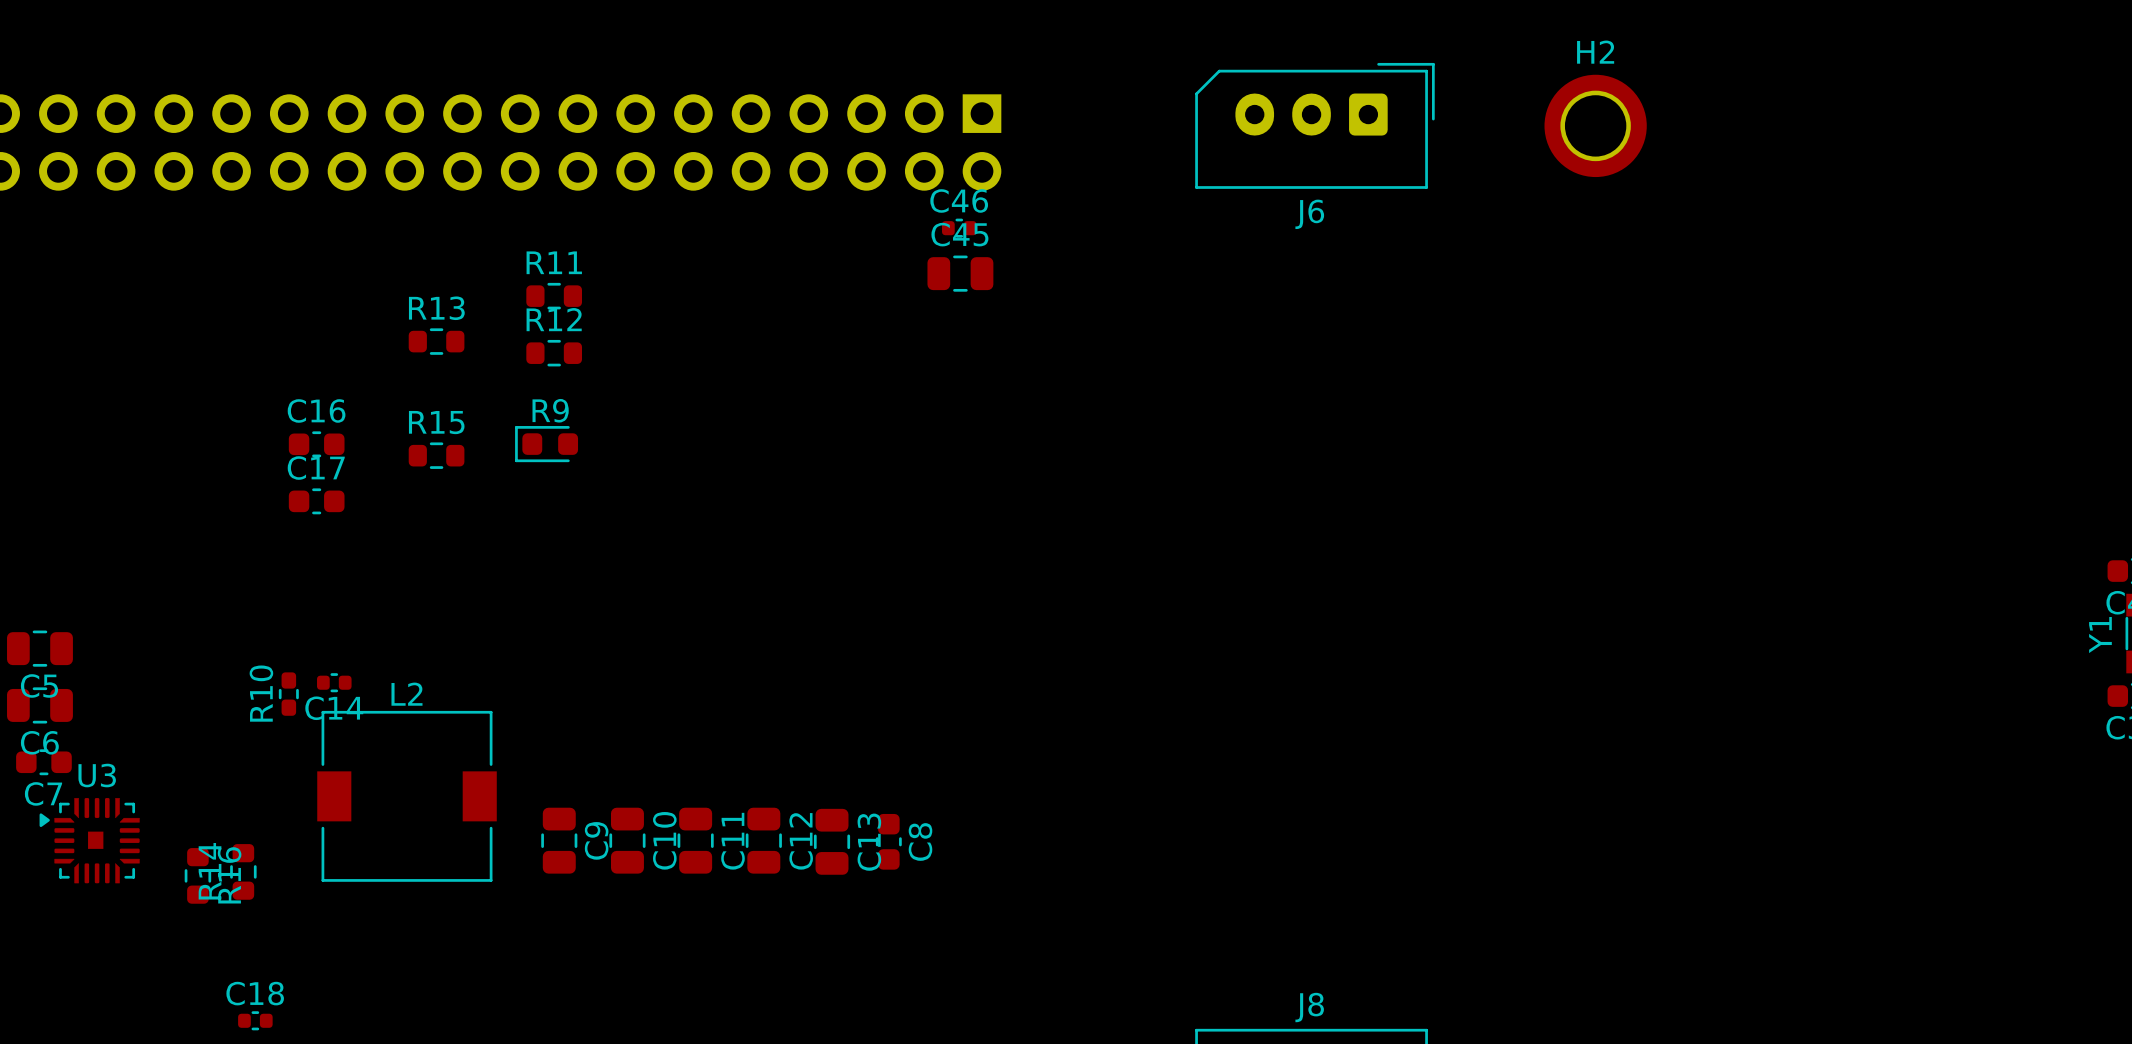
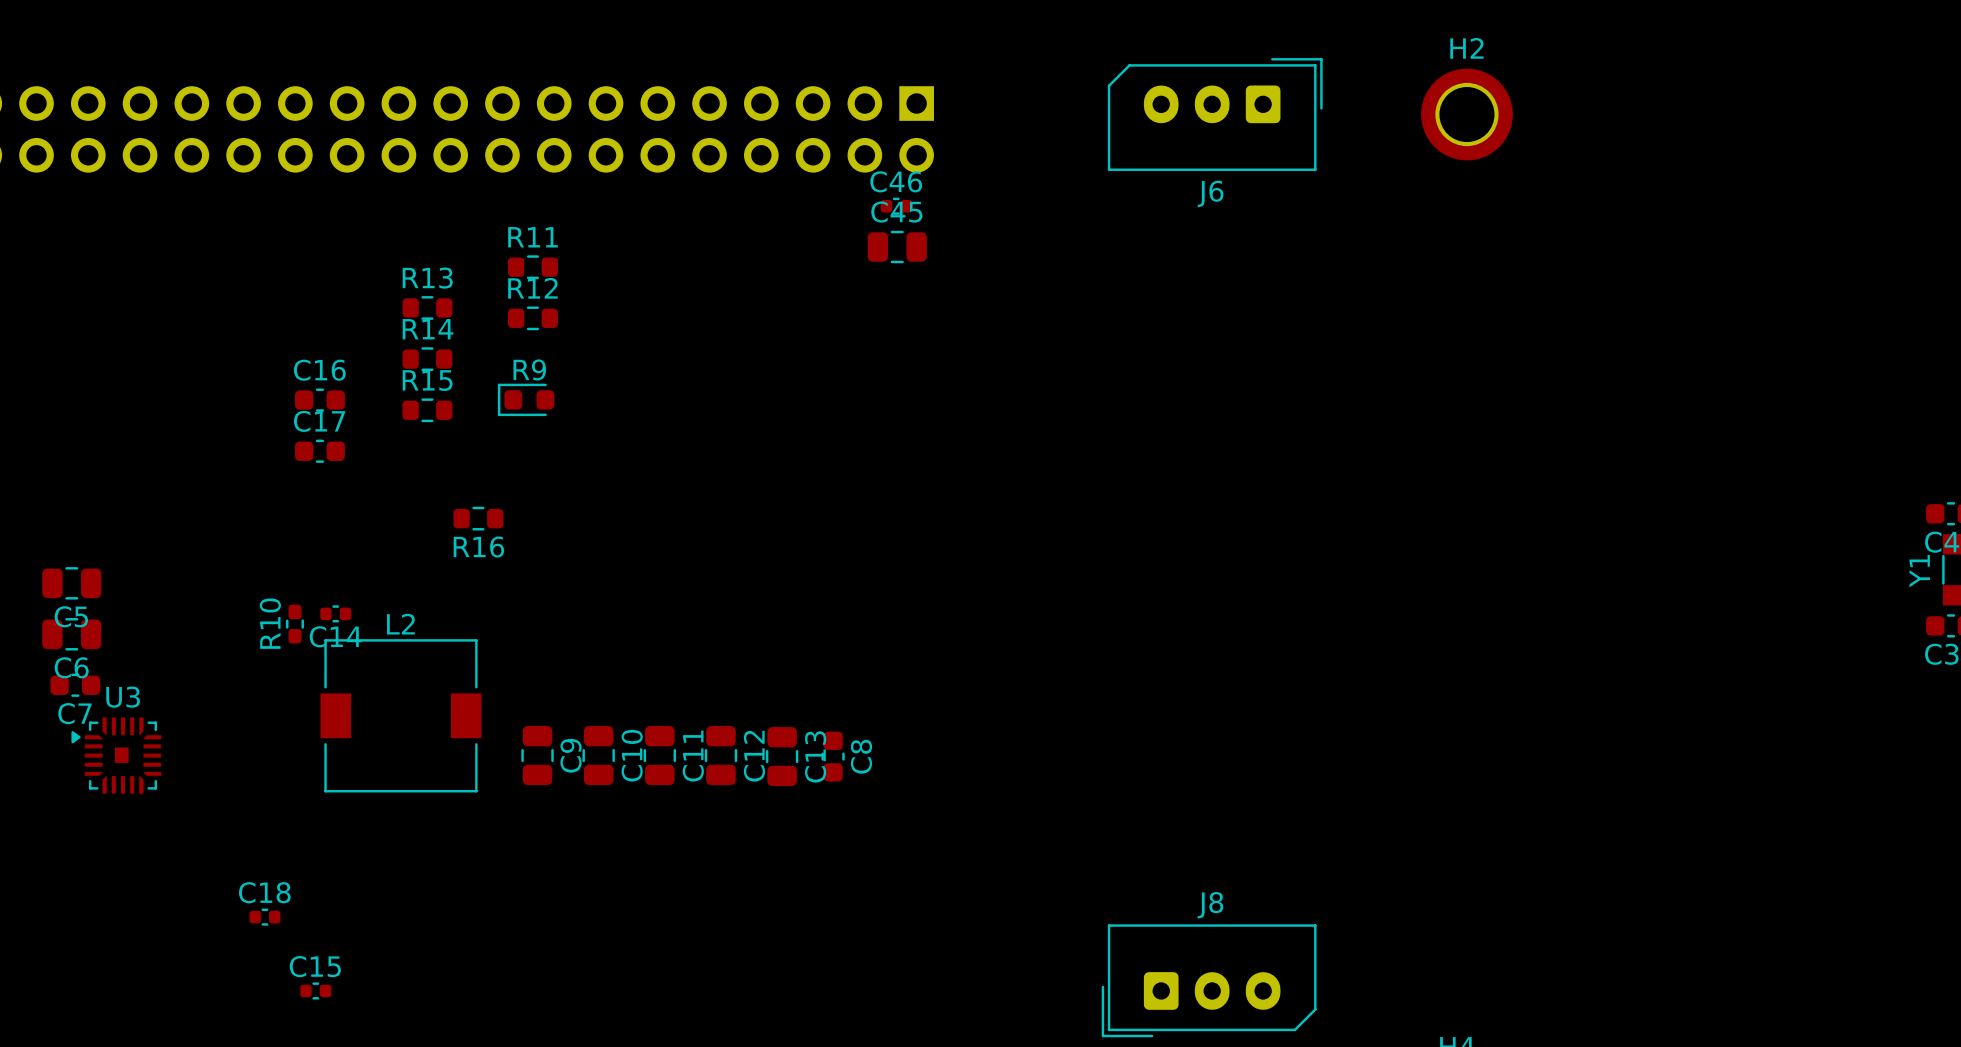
R14 rotation: 0° (243, 871) -> 90° clockwise (427, 359)
R14 position: (243, 871) -> (427, 359)
R16 rotation: 0° (197, 875) -> 90° clockwise (478, 518)
R16 position: (197, 875) -> (478, 518)

